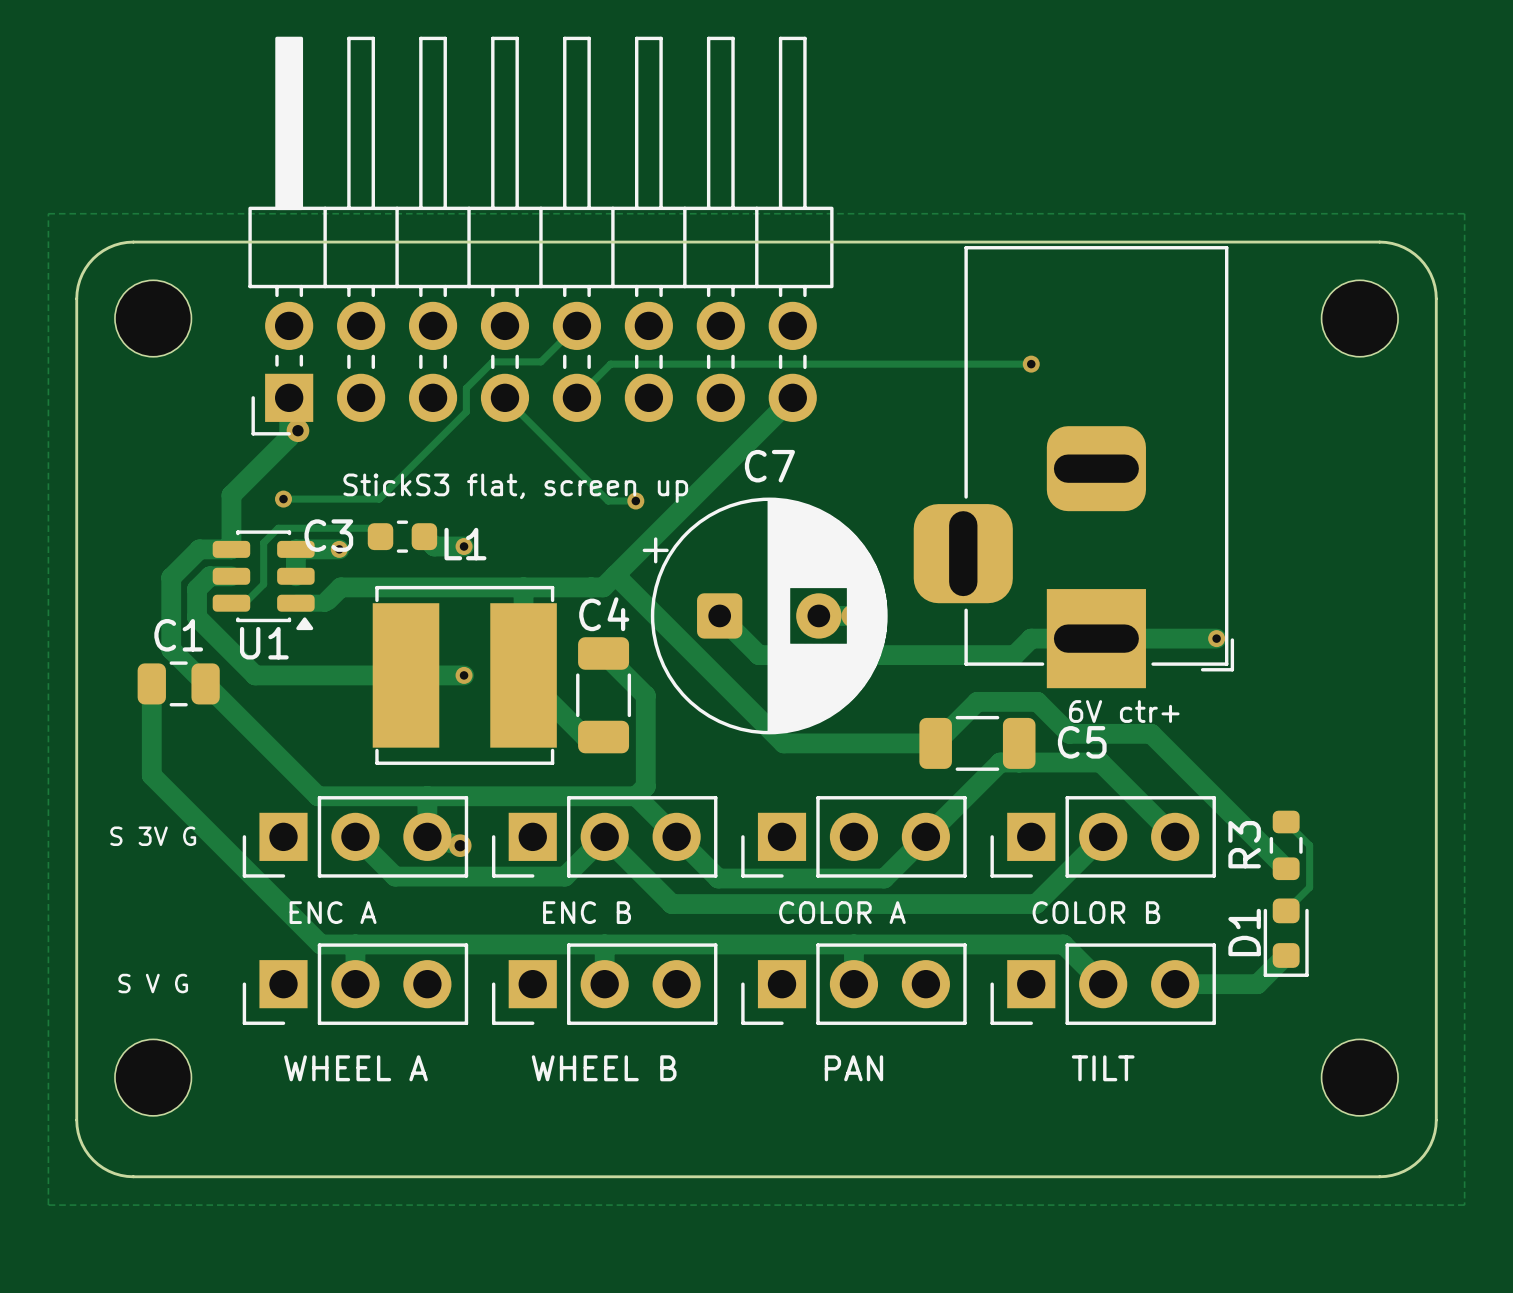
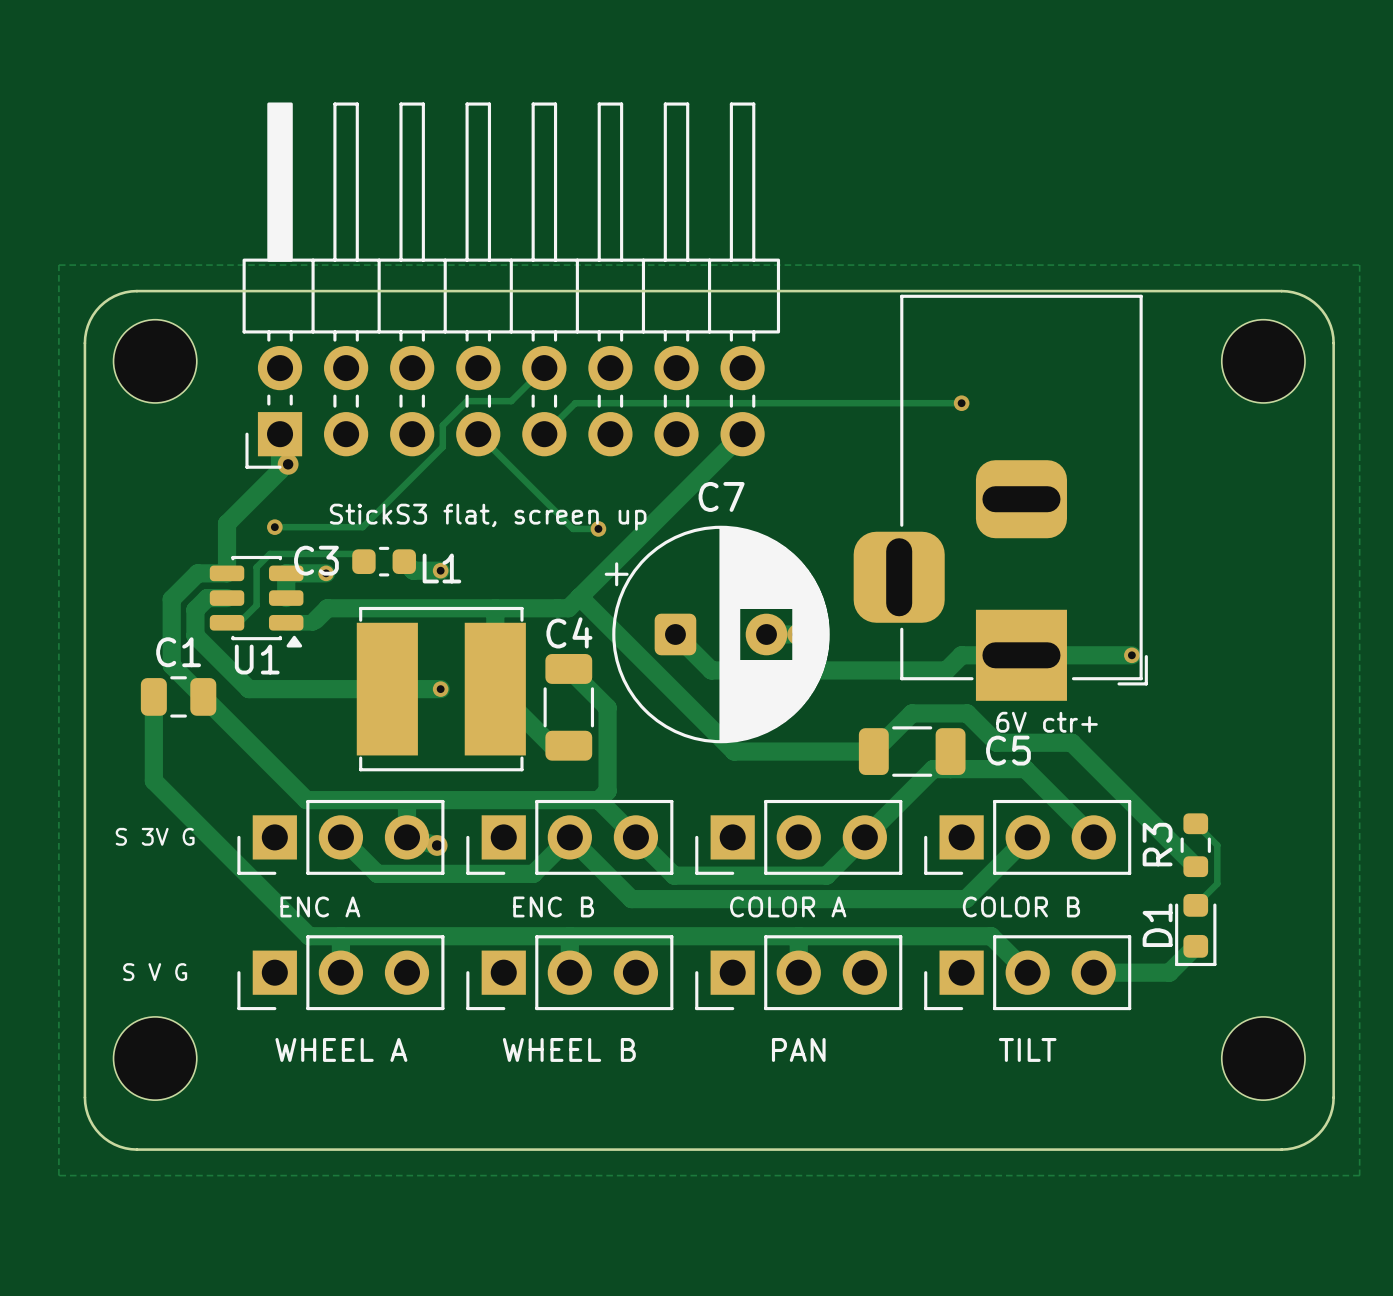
part footprint: [114, 280, 192, 357] -> [113, 319, 197, 403]
part footprint: [1321, 280, 1399, 357] -> [1221, 319, 1306, 403]
part footprint: [114, 1039, 192, 1116] -> [113, 1016, 197, 1101]
part footprint: [1321, 1039, 1399, 1116] -> [1221, 1016, 1306, 1101]

